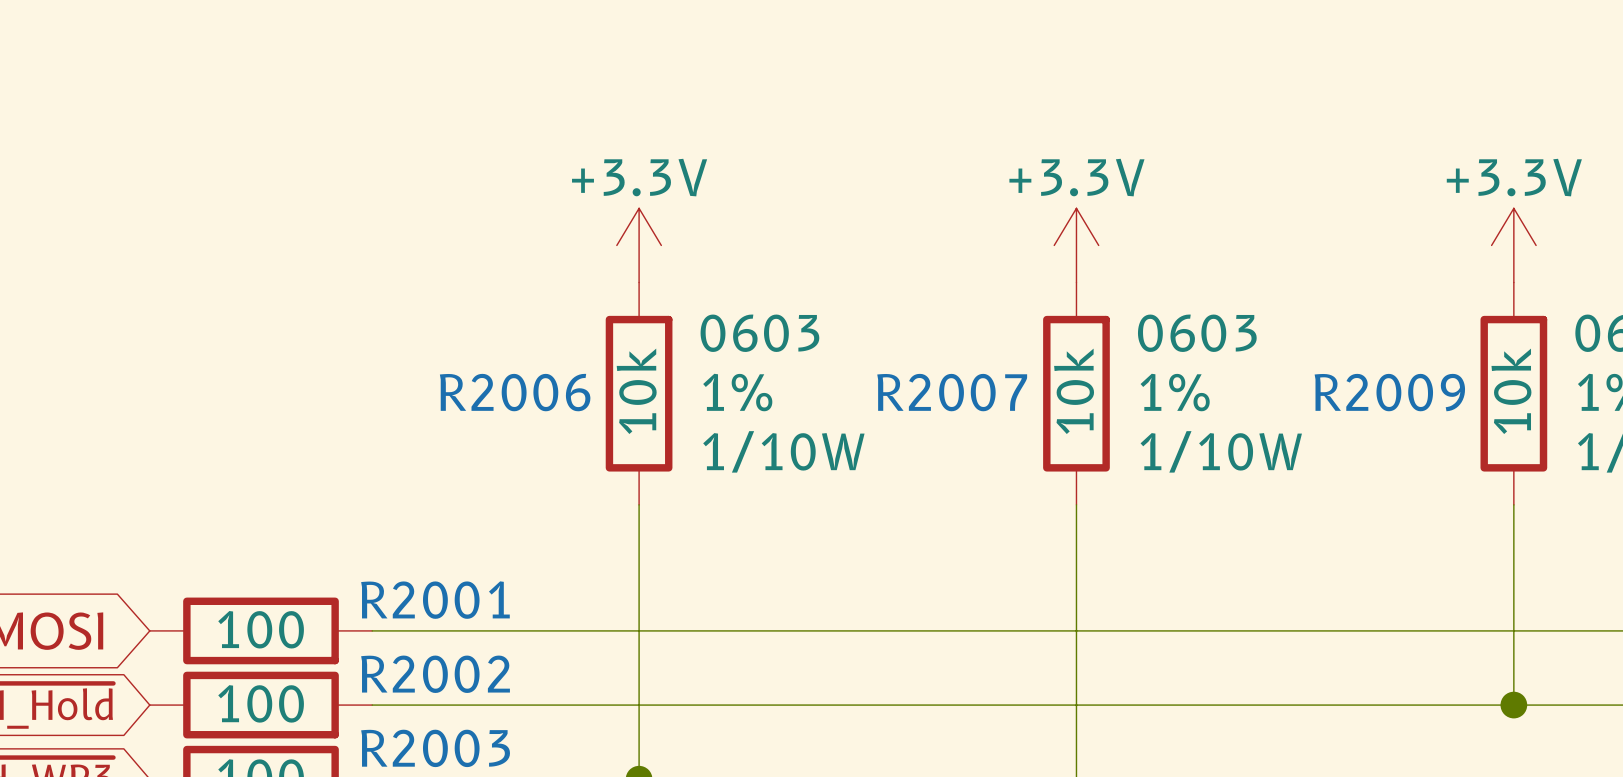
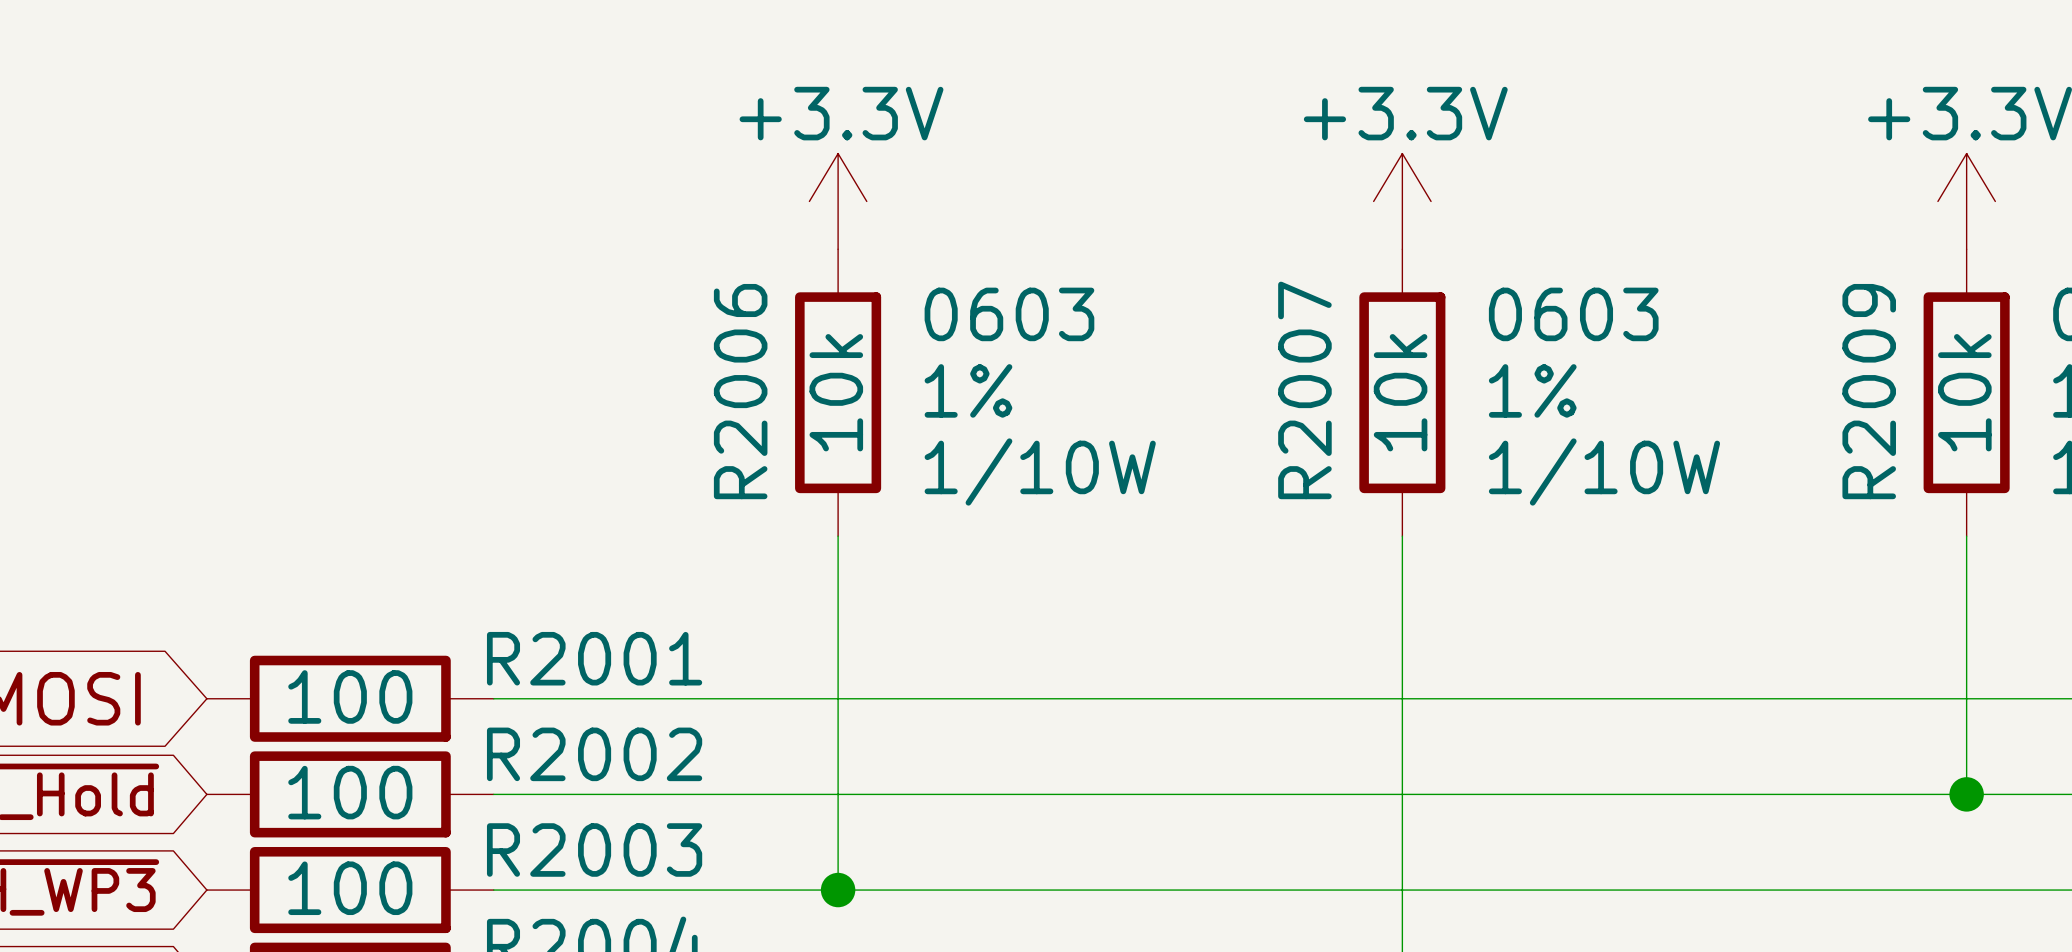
R2006 name rotation: 0° (515, 392) -> 90° counterclockwise (740, 391)
R2007 name rotation: 0° (952, 392) -> 90° counterclockwise (1304, 390)
R2009 name rotation: 0° (1389, 392) -> 90° counterclockwise (1869, 391)

